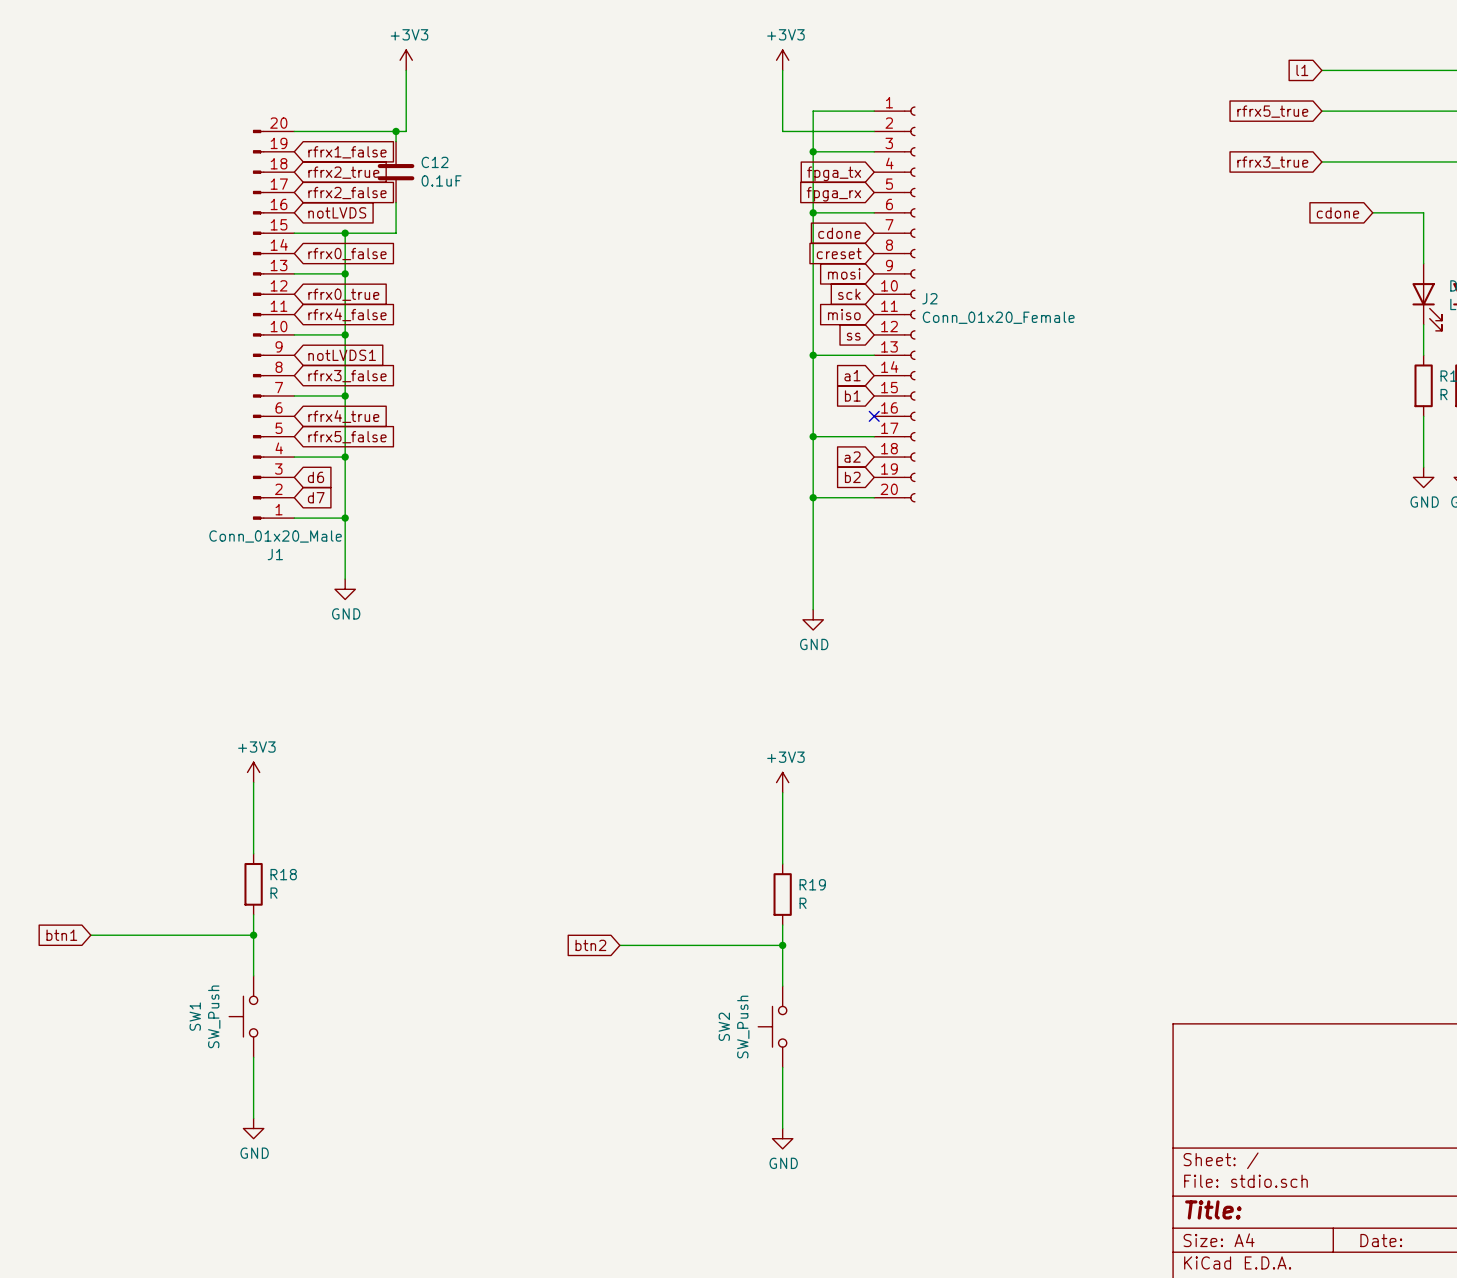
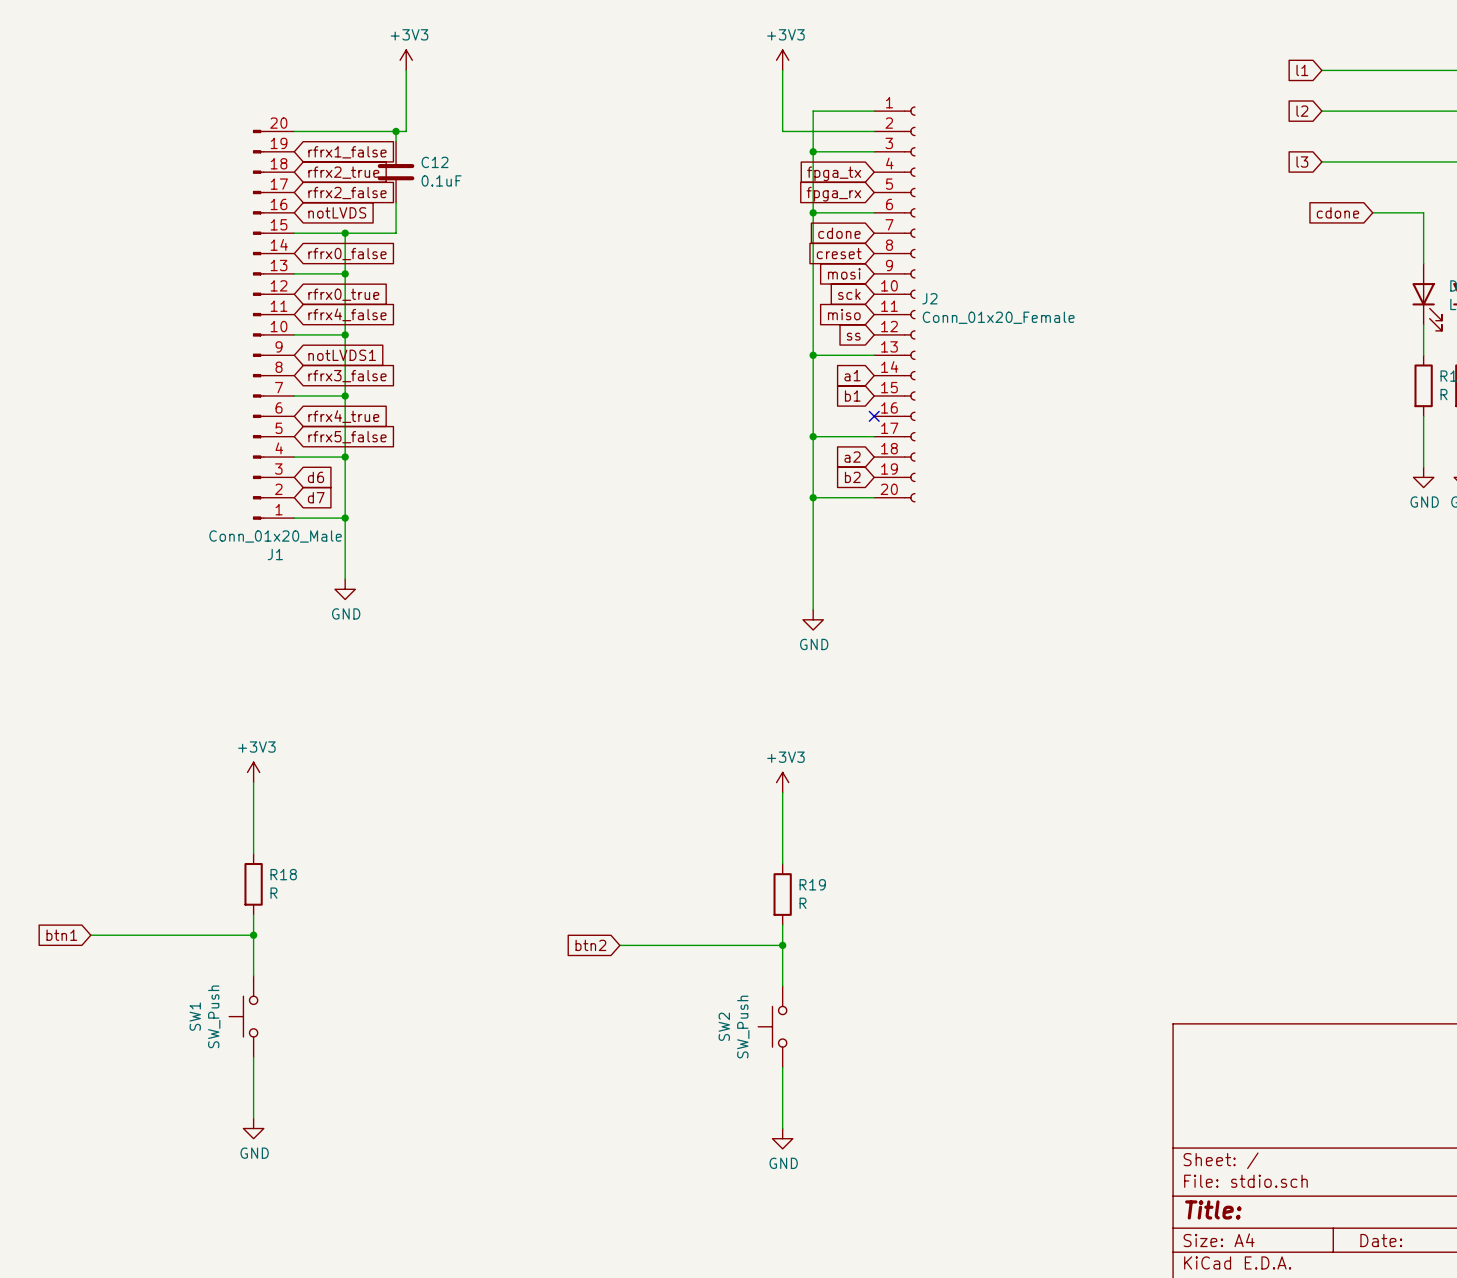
global label: rfrx5_true (1272, 111) -> l2 (1302, 111)
global label: rfrx3_true (1272, 162) -> l3 (1302, 161)

